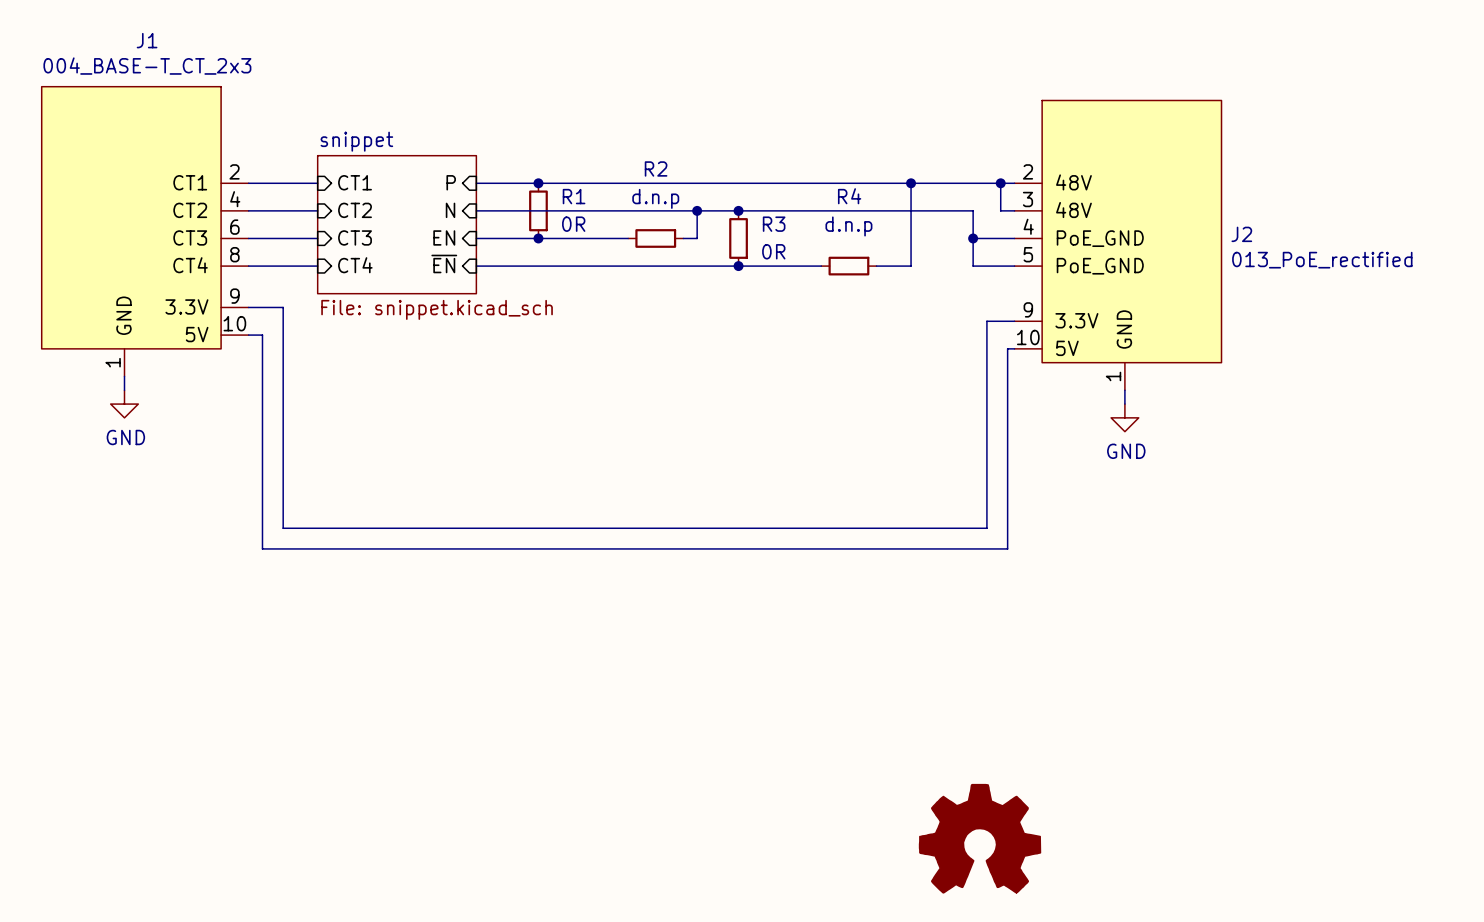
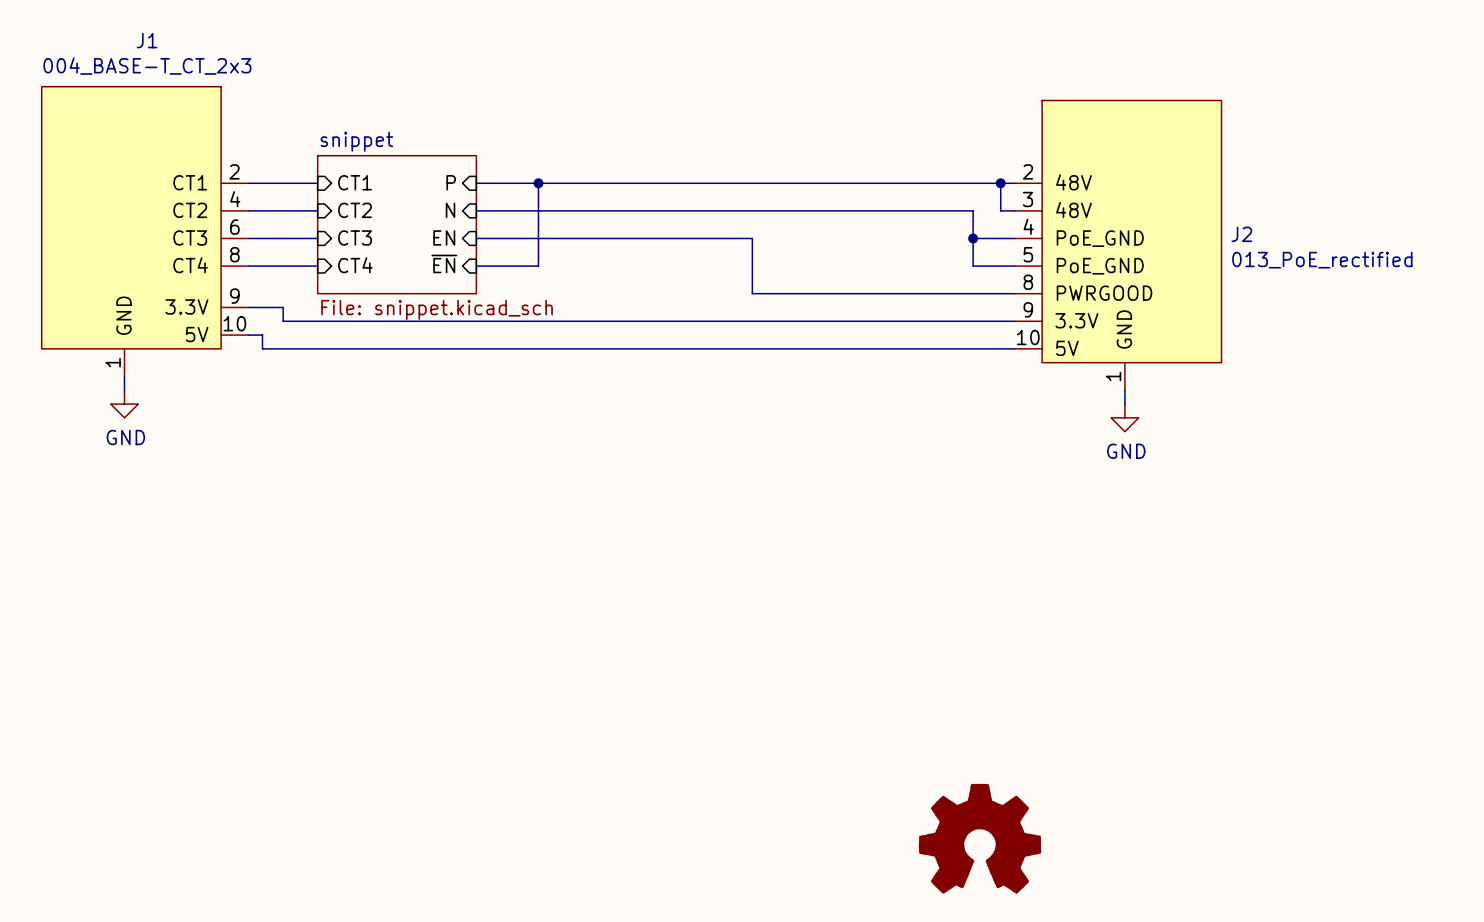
J2 symbol: [1014, 100, 1222, 391] -> [1014, 100, 1222, 391]
wire: (911, 183) (911, 266) (876, 266) -> none
junction: (911, 183) -> none
R1: 0R (538, 210) -> none
wire: (697, 210) (697, 238) -> (1014, 293) (752, 293) (752, 238) (697, 238)
junction: (697, 210) -> none
junction: (738, 210) -> none
junction: (538, 238) -> none
wire: none -> (628, 238) (683, 238)
R2: d.n.p (655, 238) -> none
R3: 0R (738, 238) -> none
wire: (538, 266) (821, 266) -> (538, 266) (538, 183)
junction: (738, 266) -> none
R4: d.n.p (848, 266) -> none
wire: (283, 321) (283, 528) (986, 528) (986, 321) -> (283, 321) (986, 321)
wire: (262, 348) (262, 548) (1007, 548) (1007, 348) -> (262, 348) (1007, 348)

